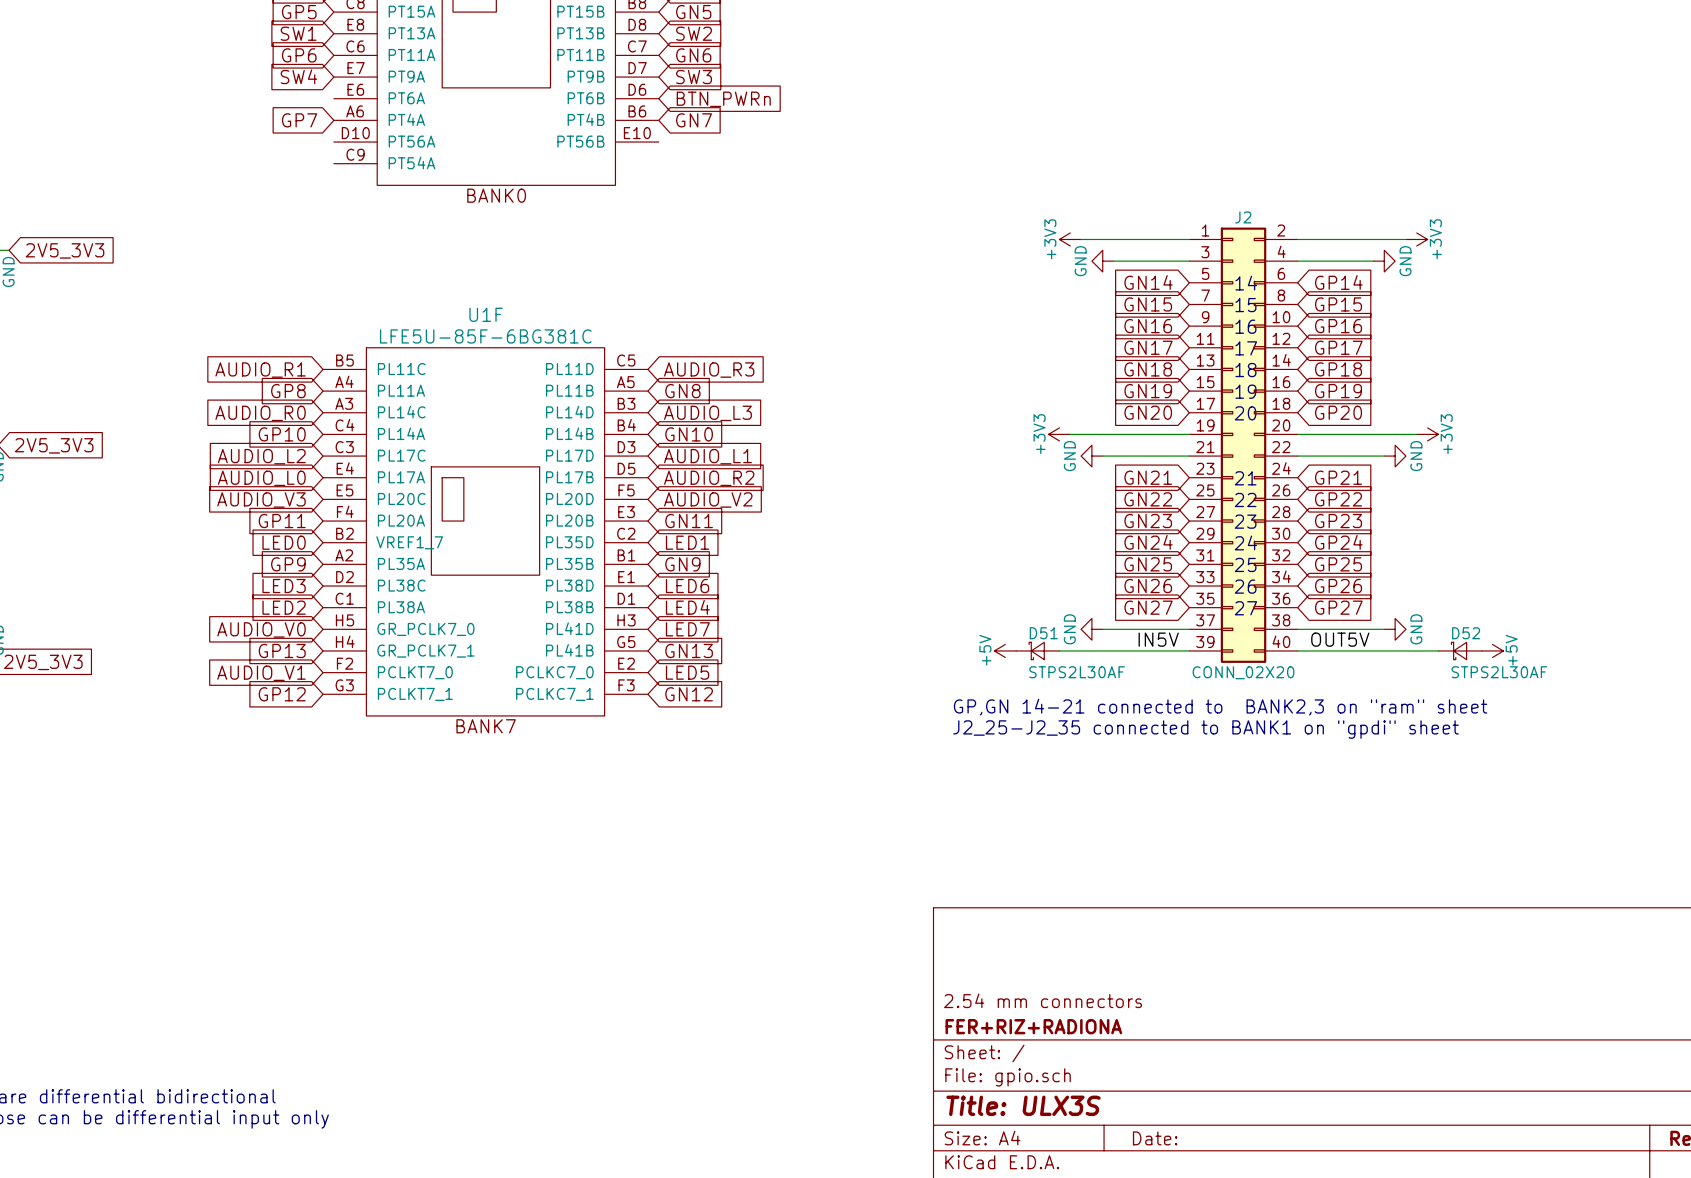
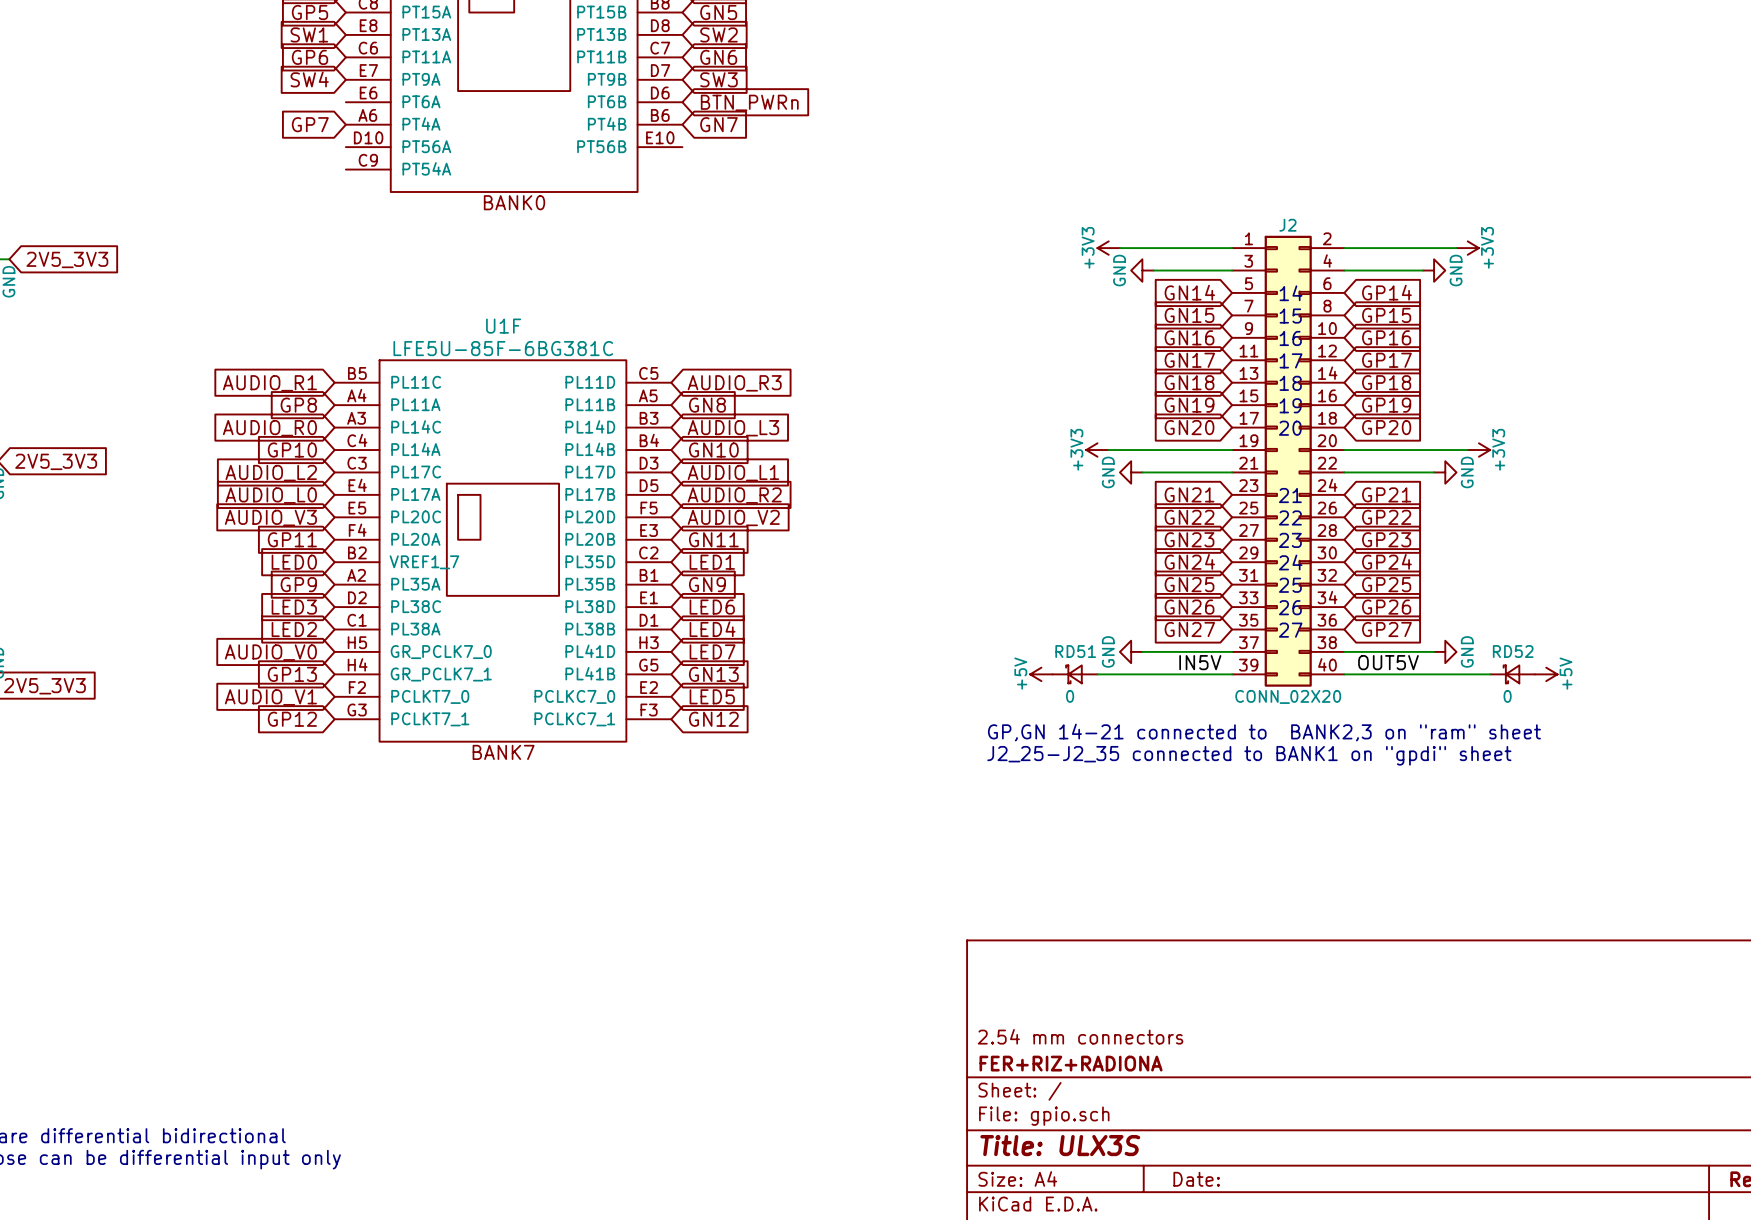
D51 name: D51 (1043, 633) -> RD51 (1075, 651)
D52 name: D52 (1466, 633) -> RD52 (1513, 651)
D51 value: STPS2L30AF (1077, 672) -> 0 (1070, 696)
D52 value: STPS2L30AF (1499, 672) -> 0 (1507, 696)

